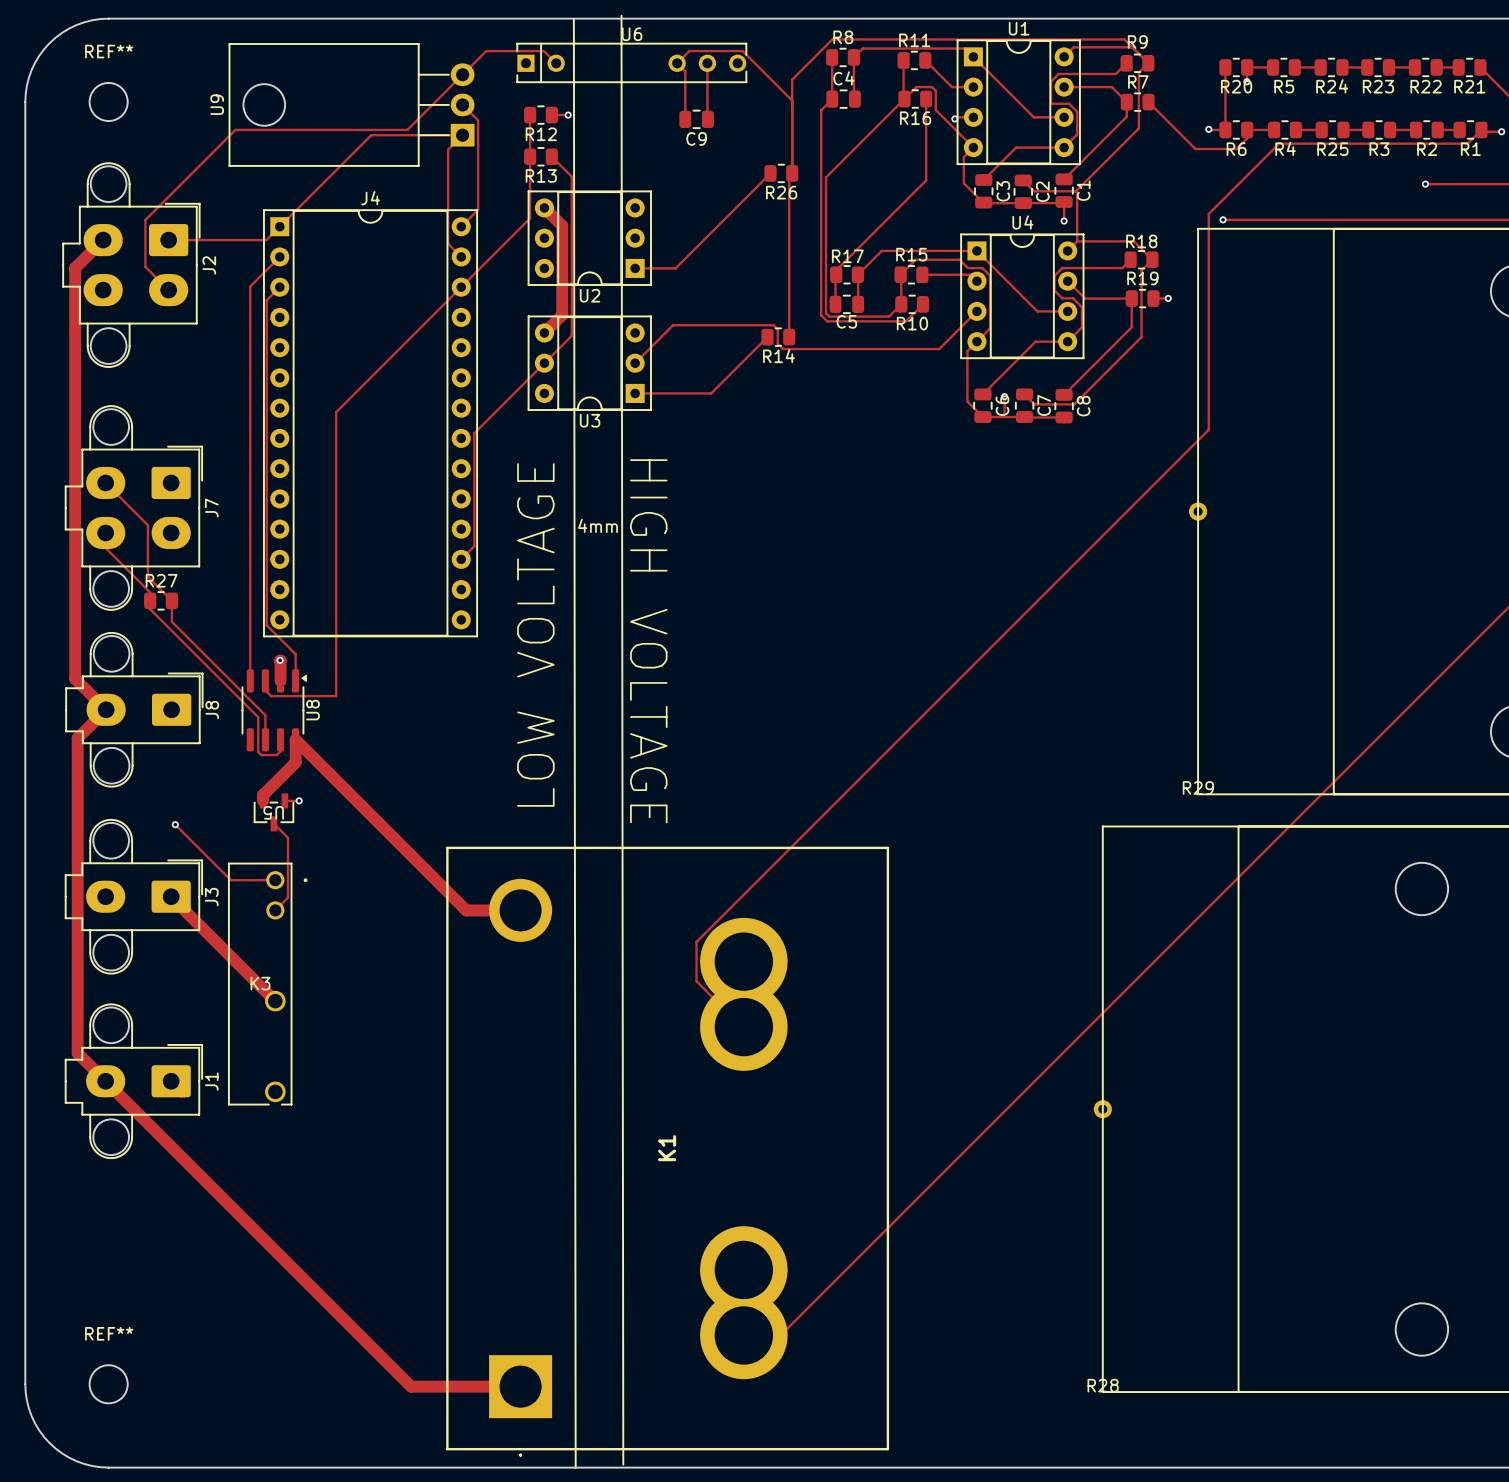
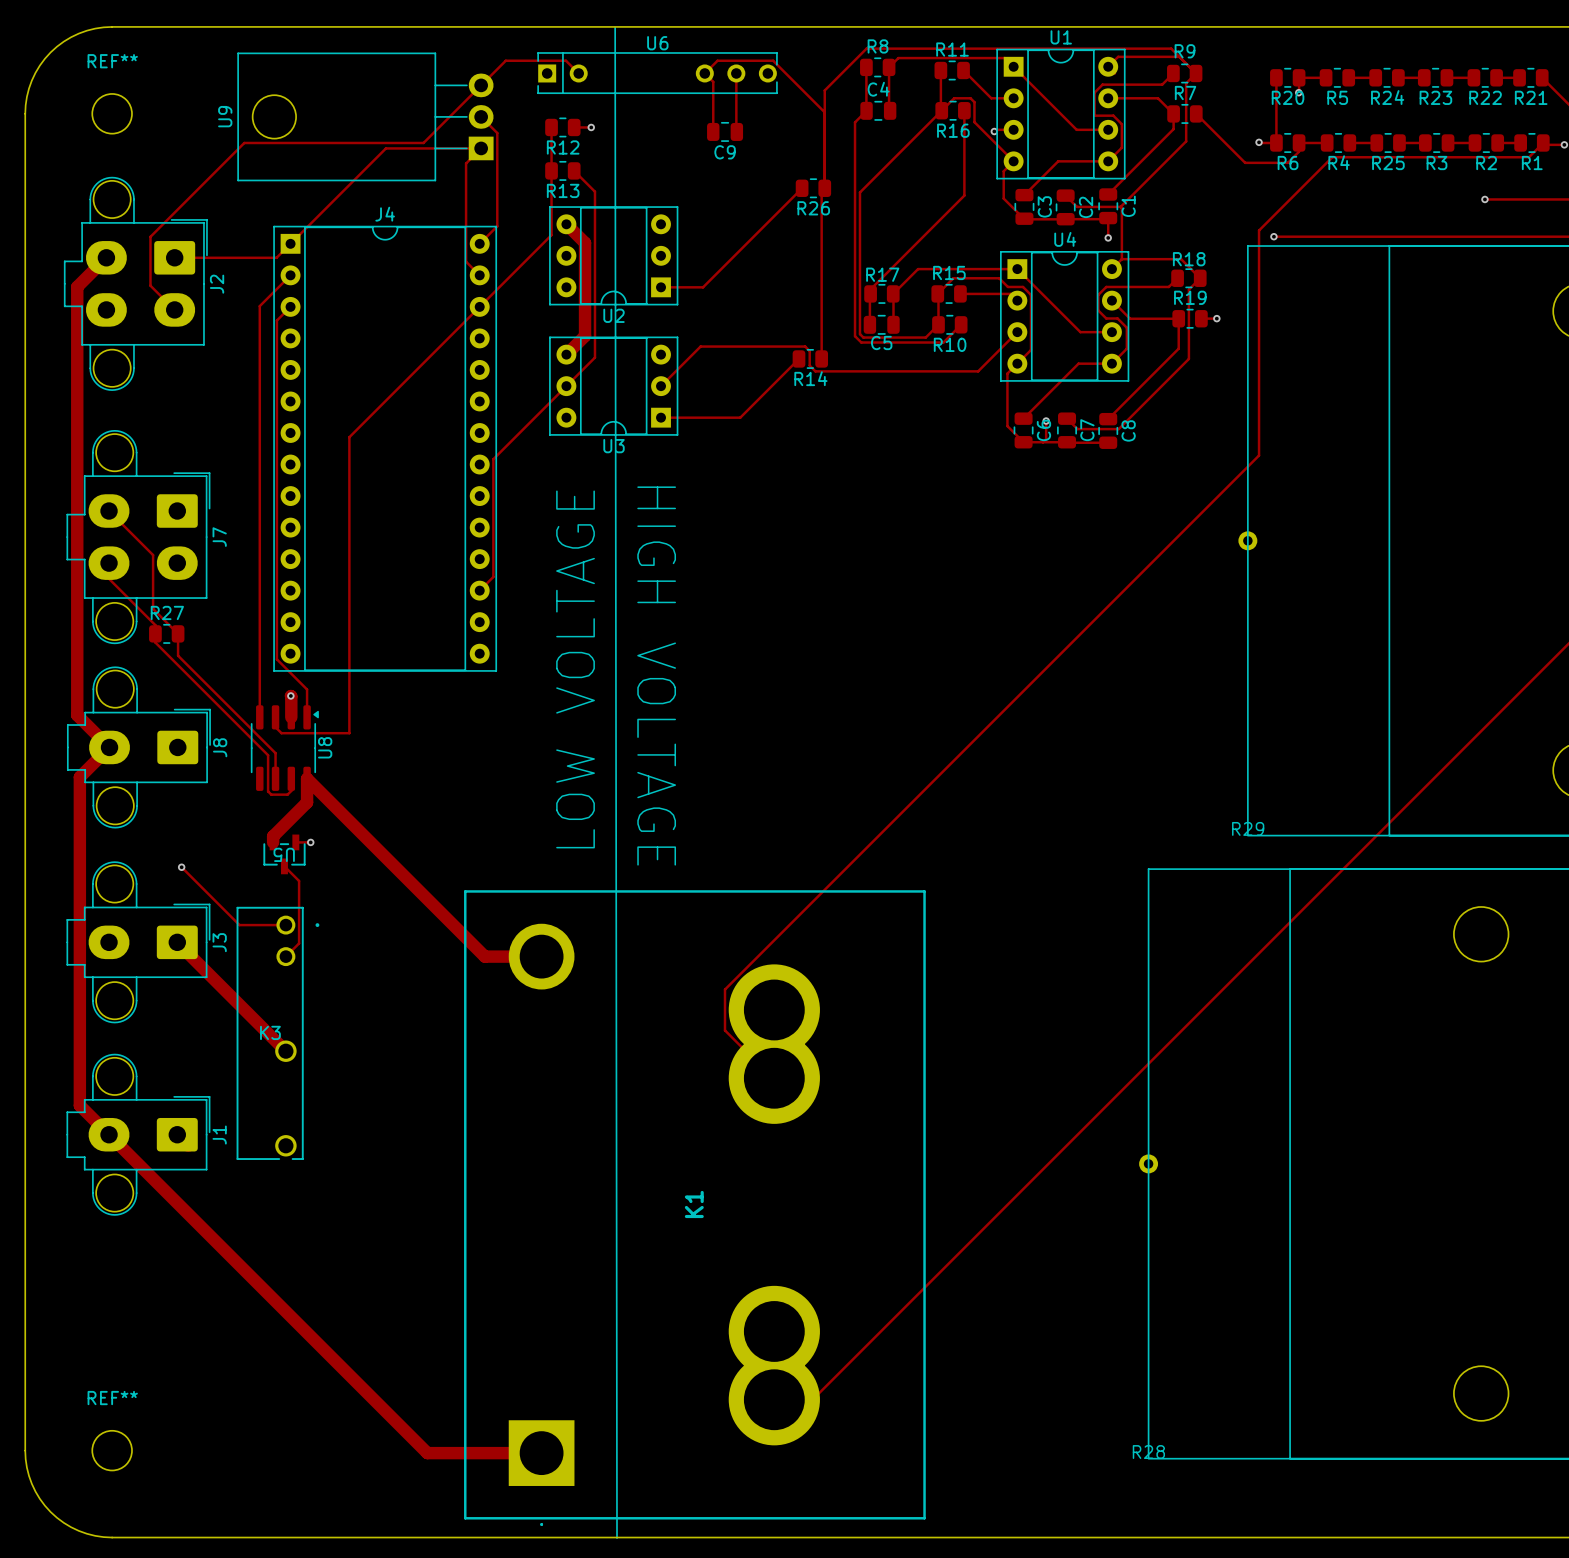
line: (621, 15) (623, 1464) -> none
line: (573, 19) (575, 1468) -> (615, 27) (617, 1538)
text: 4mm (598, 525) -> none
text position: LOW VOLTAGE (535, 634) -> LOW VOLTAGE (575, 669)
text position: HIGH VOLTAGE (648, 641) -> HIGH VOLTAGE (656, 676)

